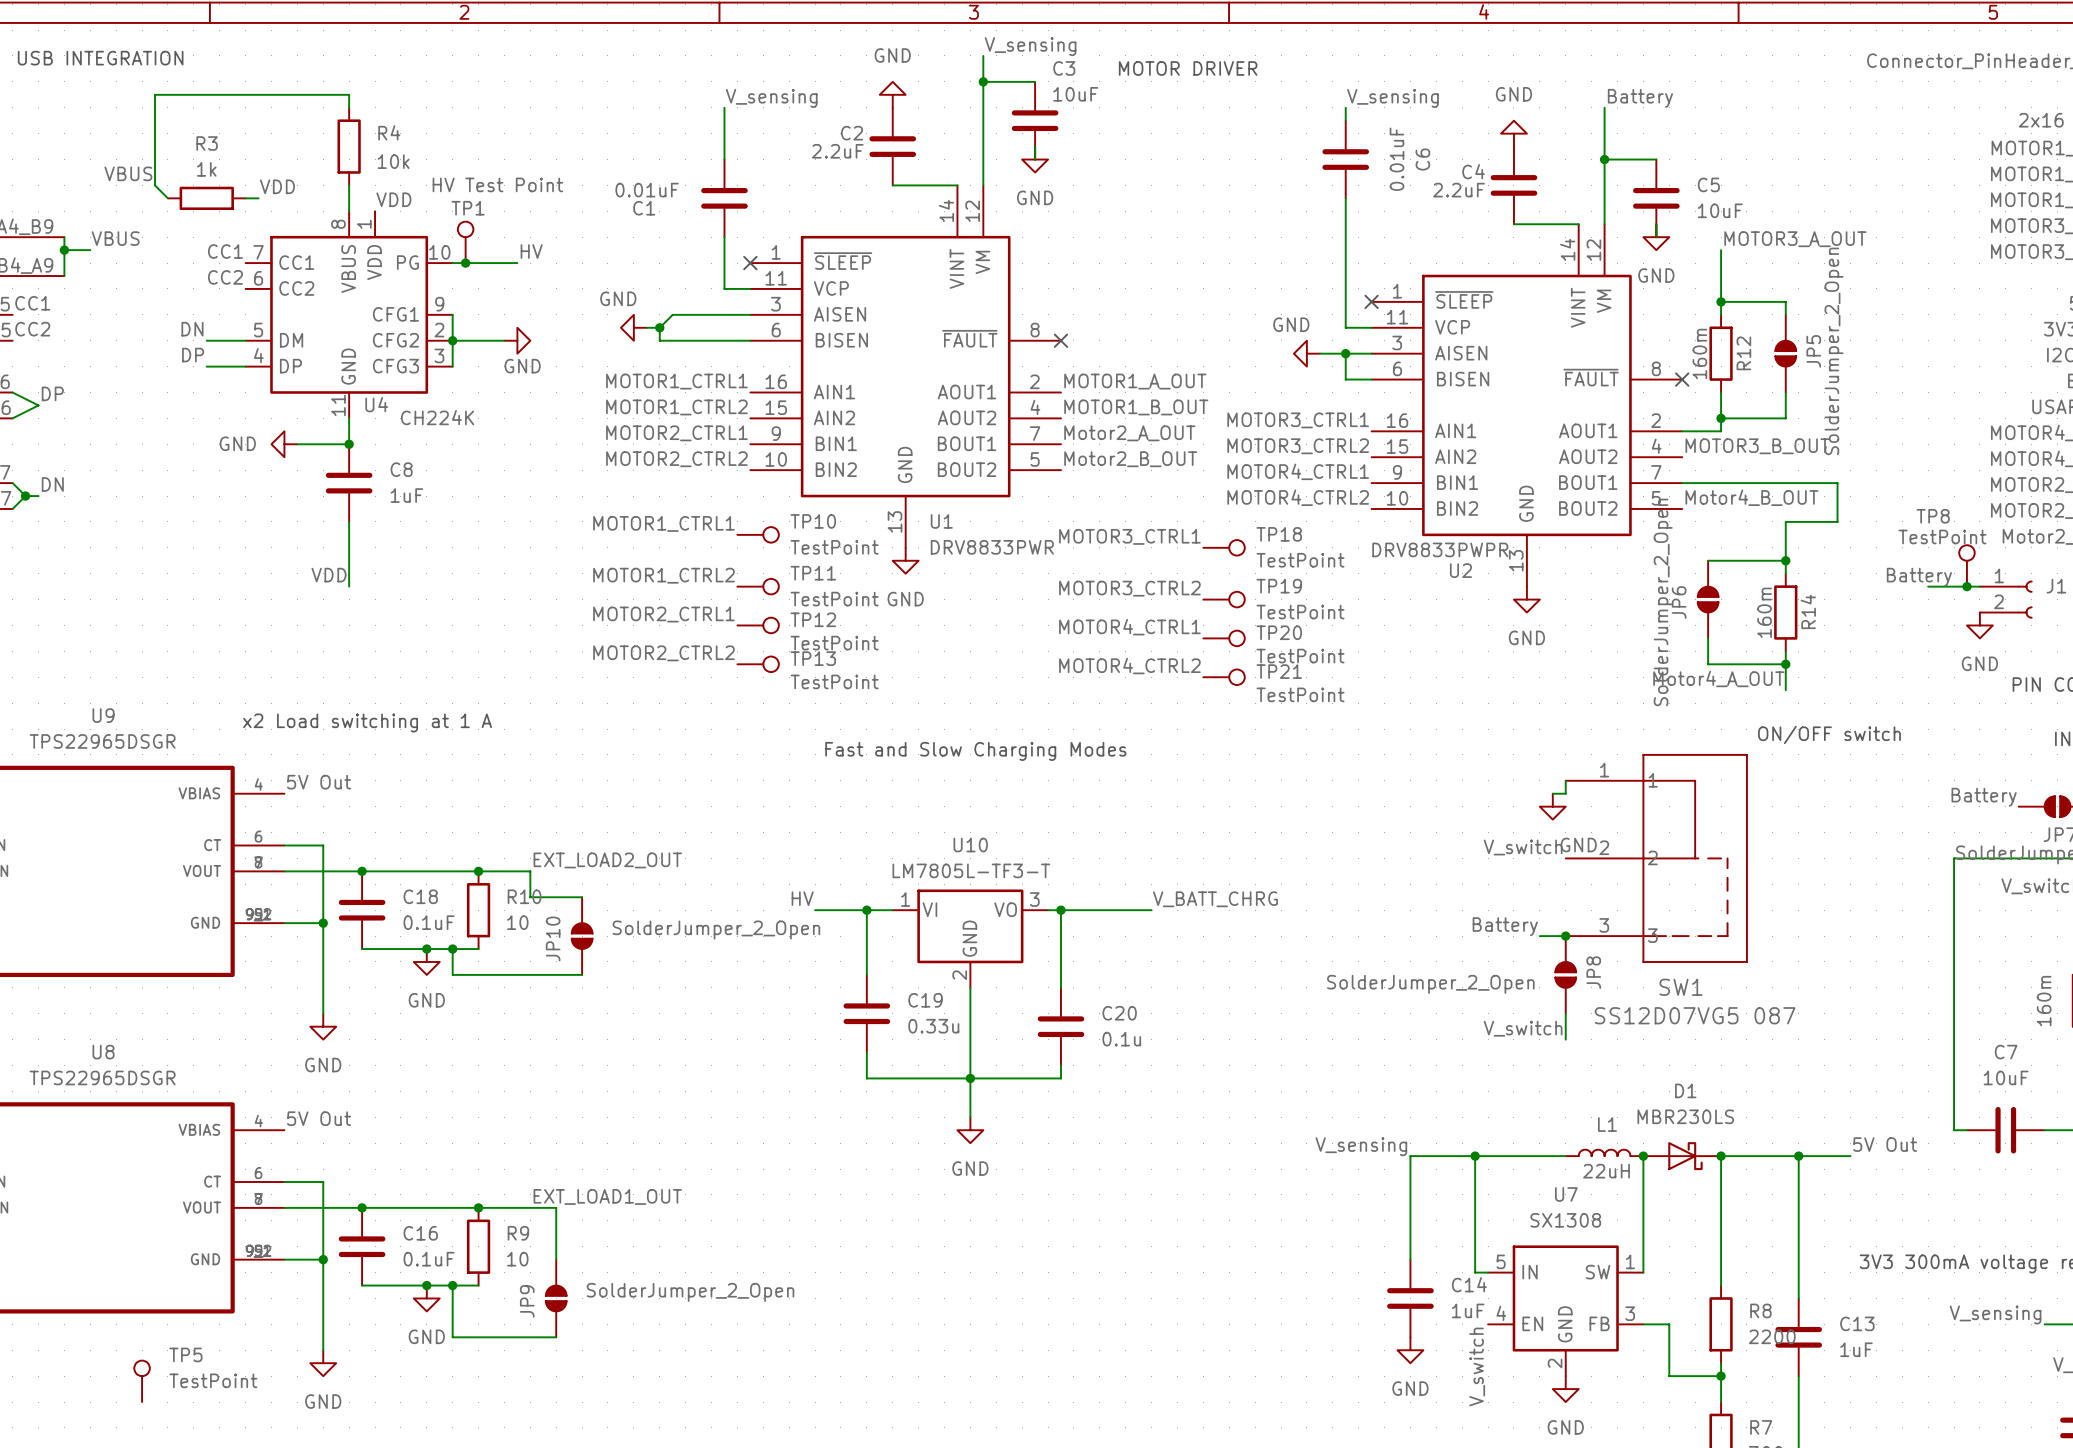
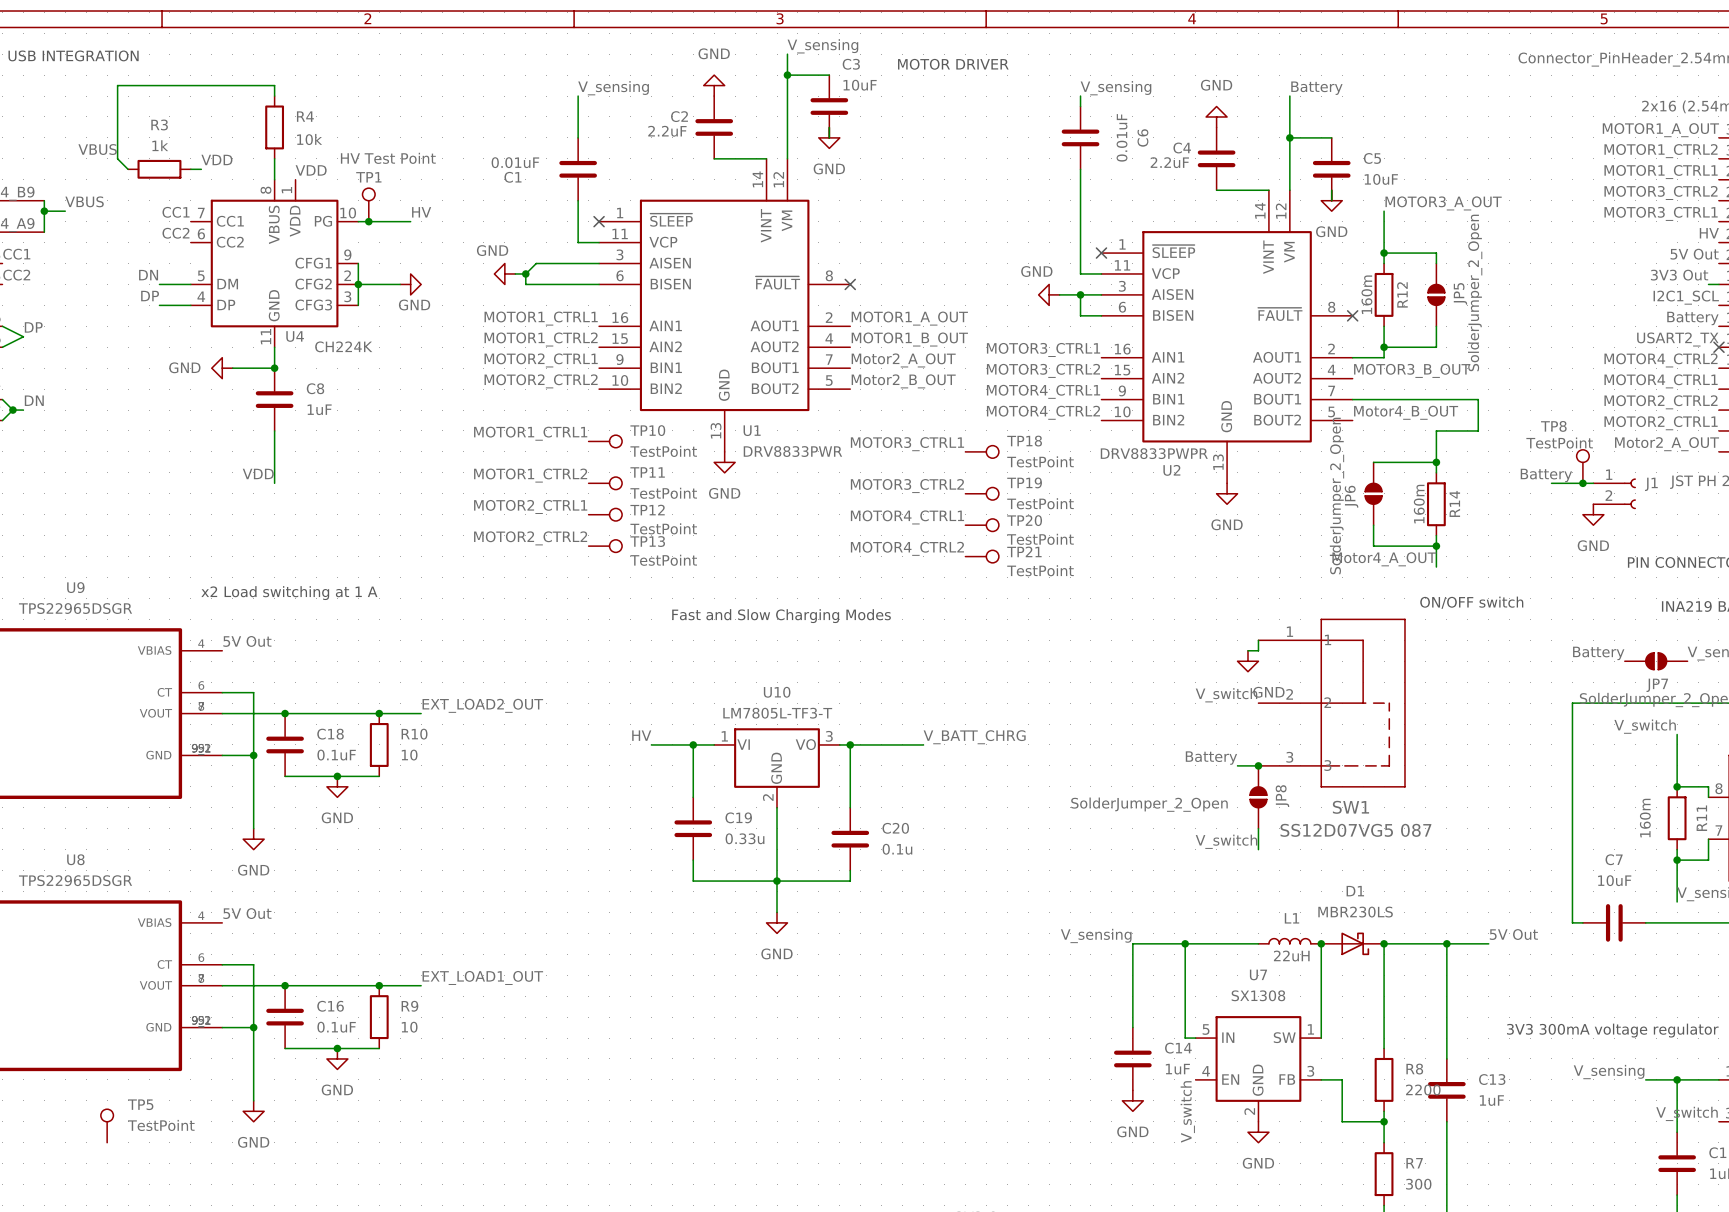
wire: (530, 871) (530, 897) (582, 897) -> none
JP10: SolderJumper_2_Open (582, 936) -> none
wire: (452, 949) (452, 974) (582, 974) -> none
junction: (452, 949) -> none
wire: (530, 1207) (556, 1207) (556, 1259) -> none
wire: (452, 1285) (452, 1337) (556, 1337) -> none
junction: (452, 1285) -> none
JP9: SolderJumper_2_Open (556, 1298) -> none

